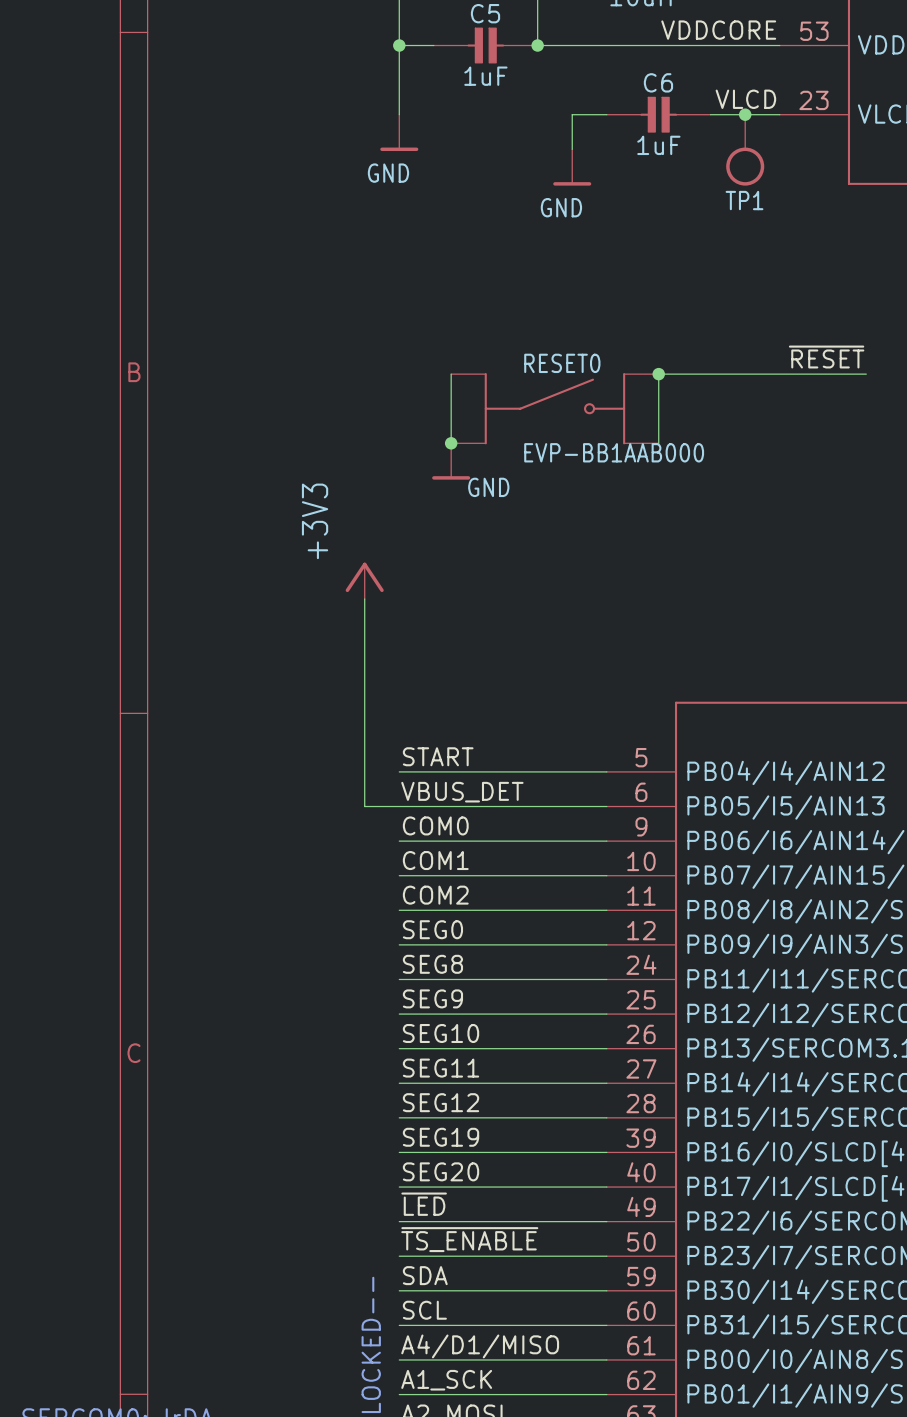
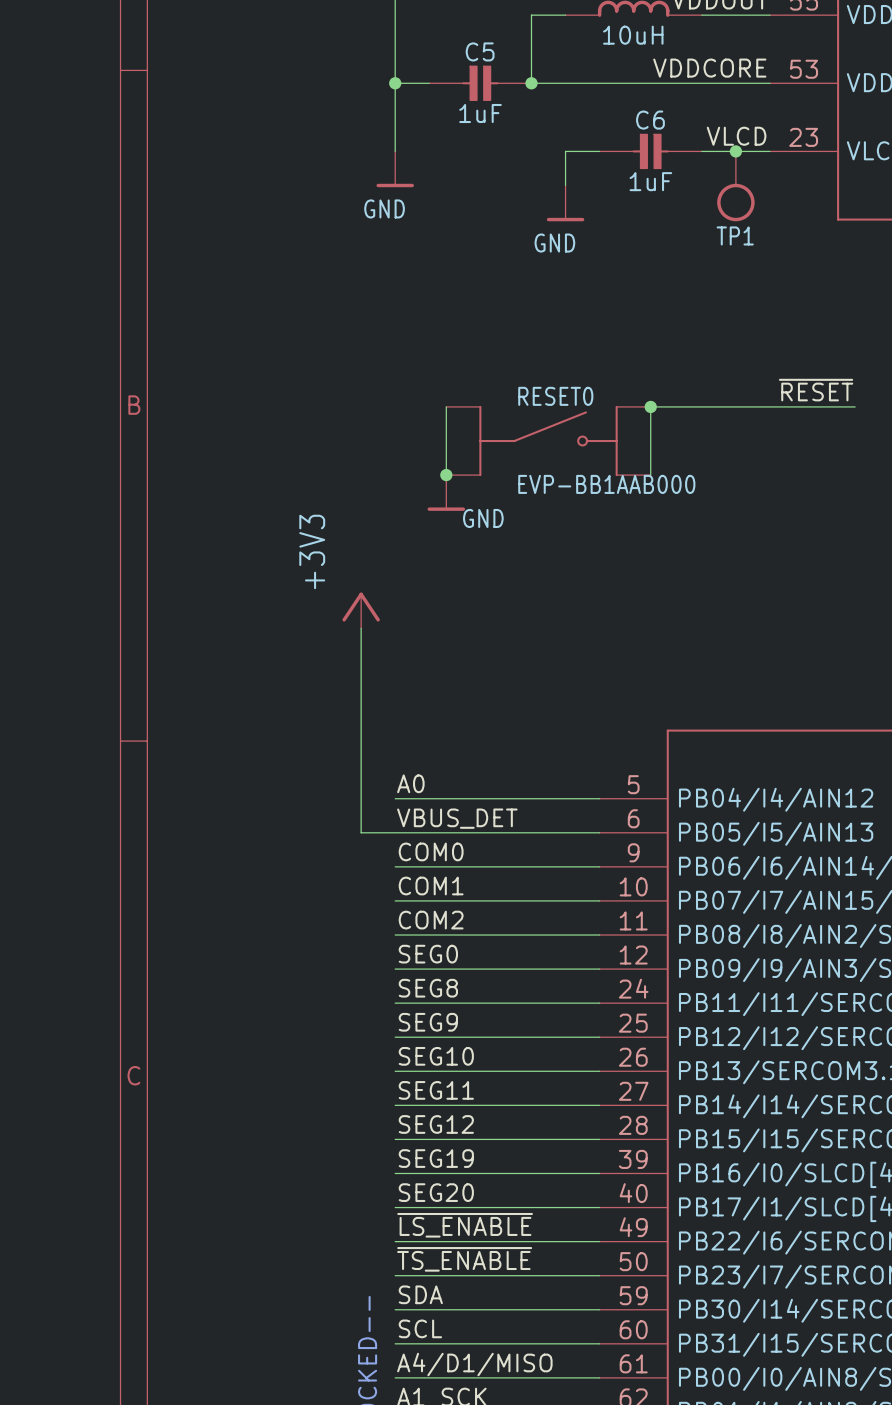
label: START (438, 756) -> A0 (410, 783)
label: ~{LED} (424, 1204) -> ~{LS_ENABLE} (465, 1225)

